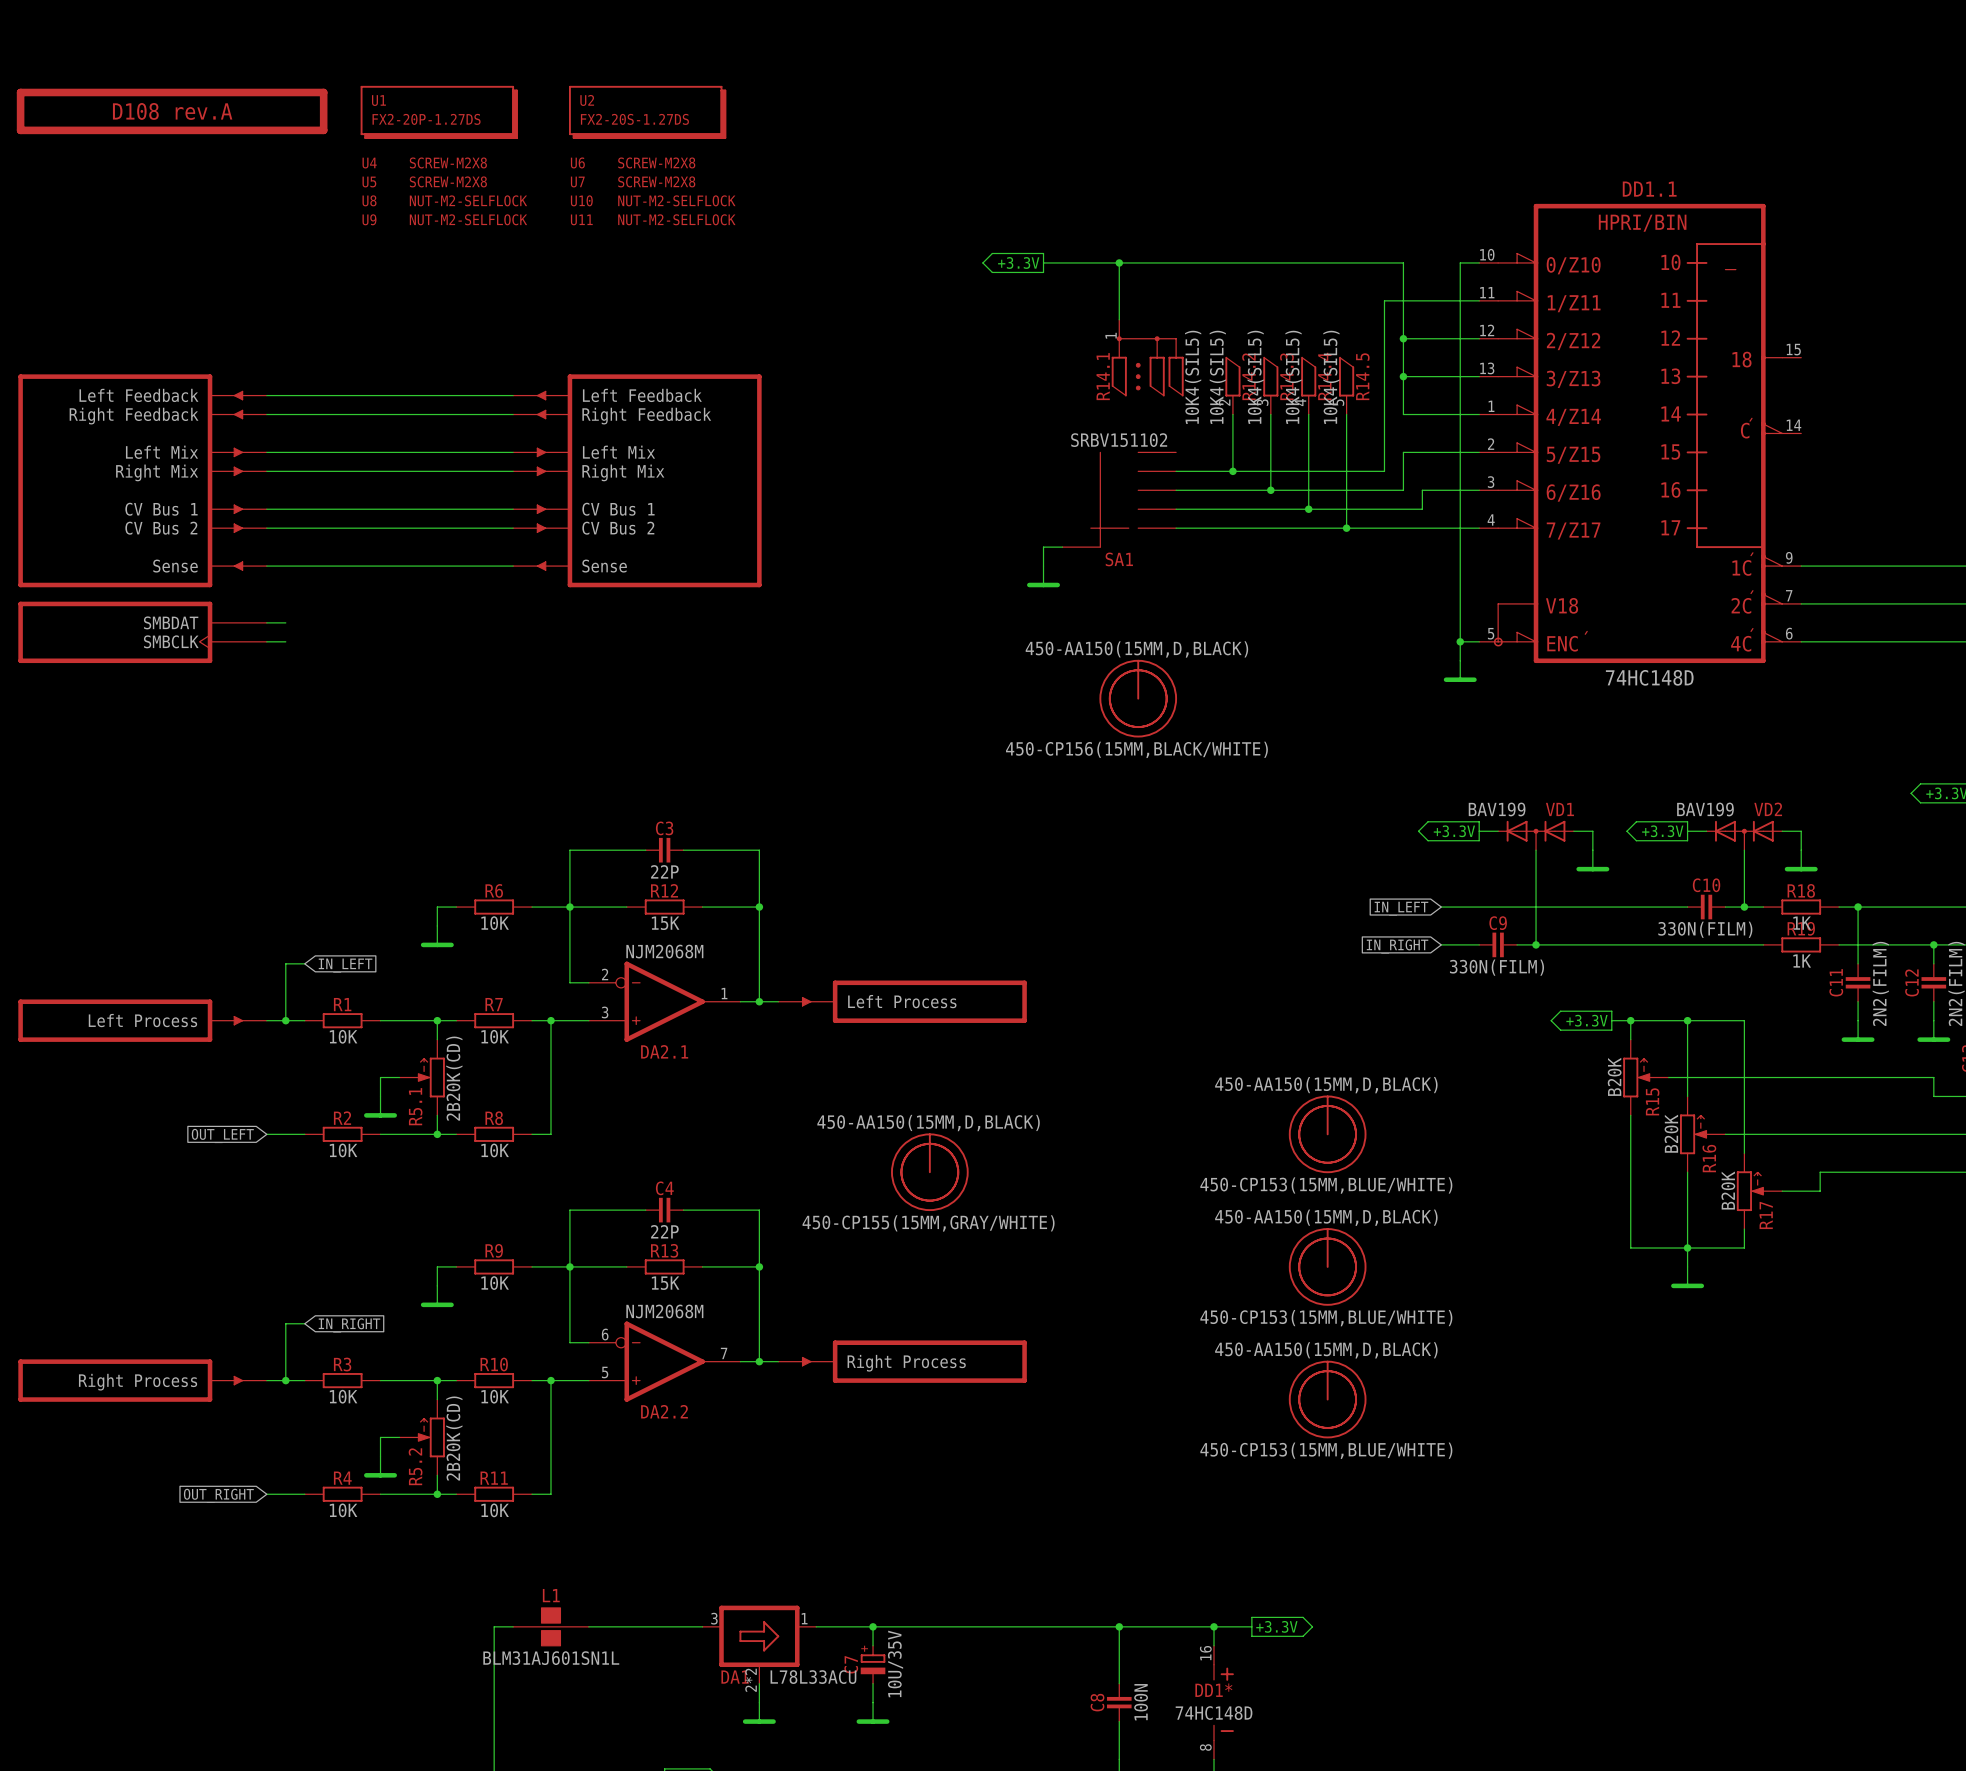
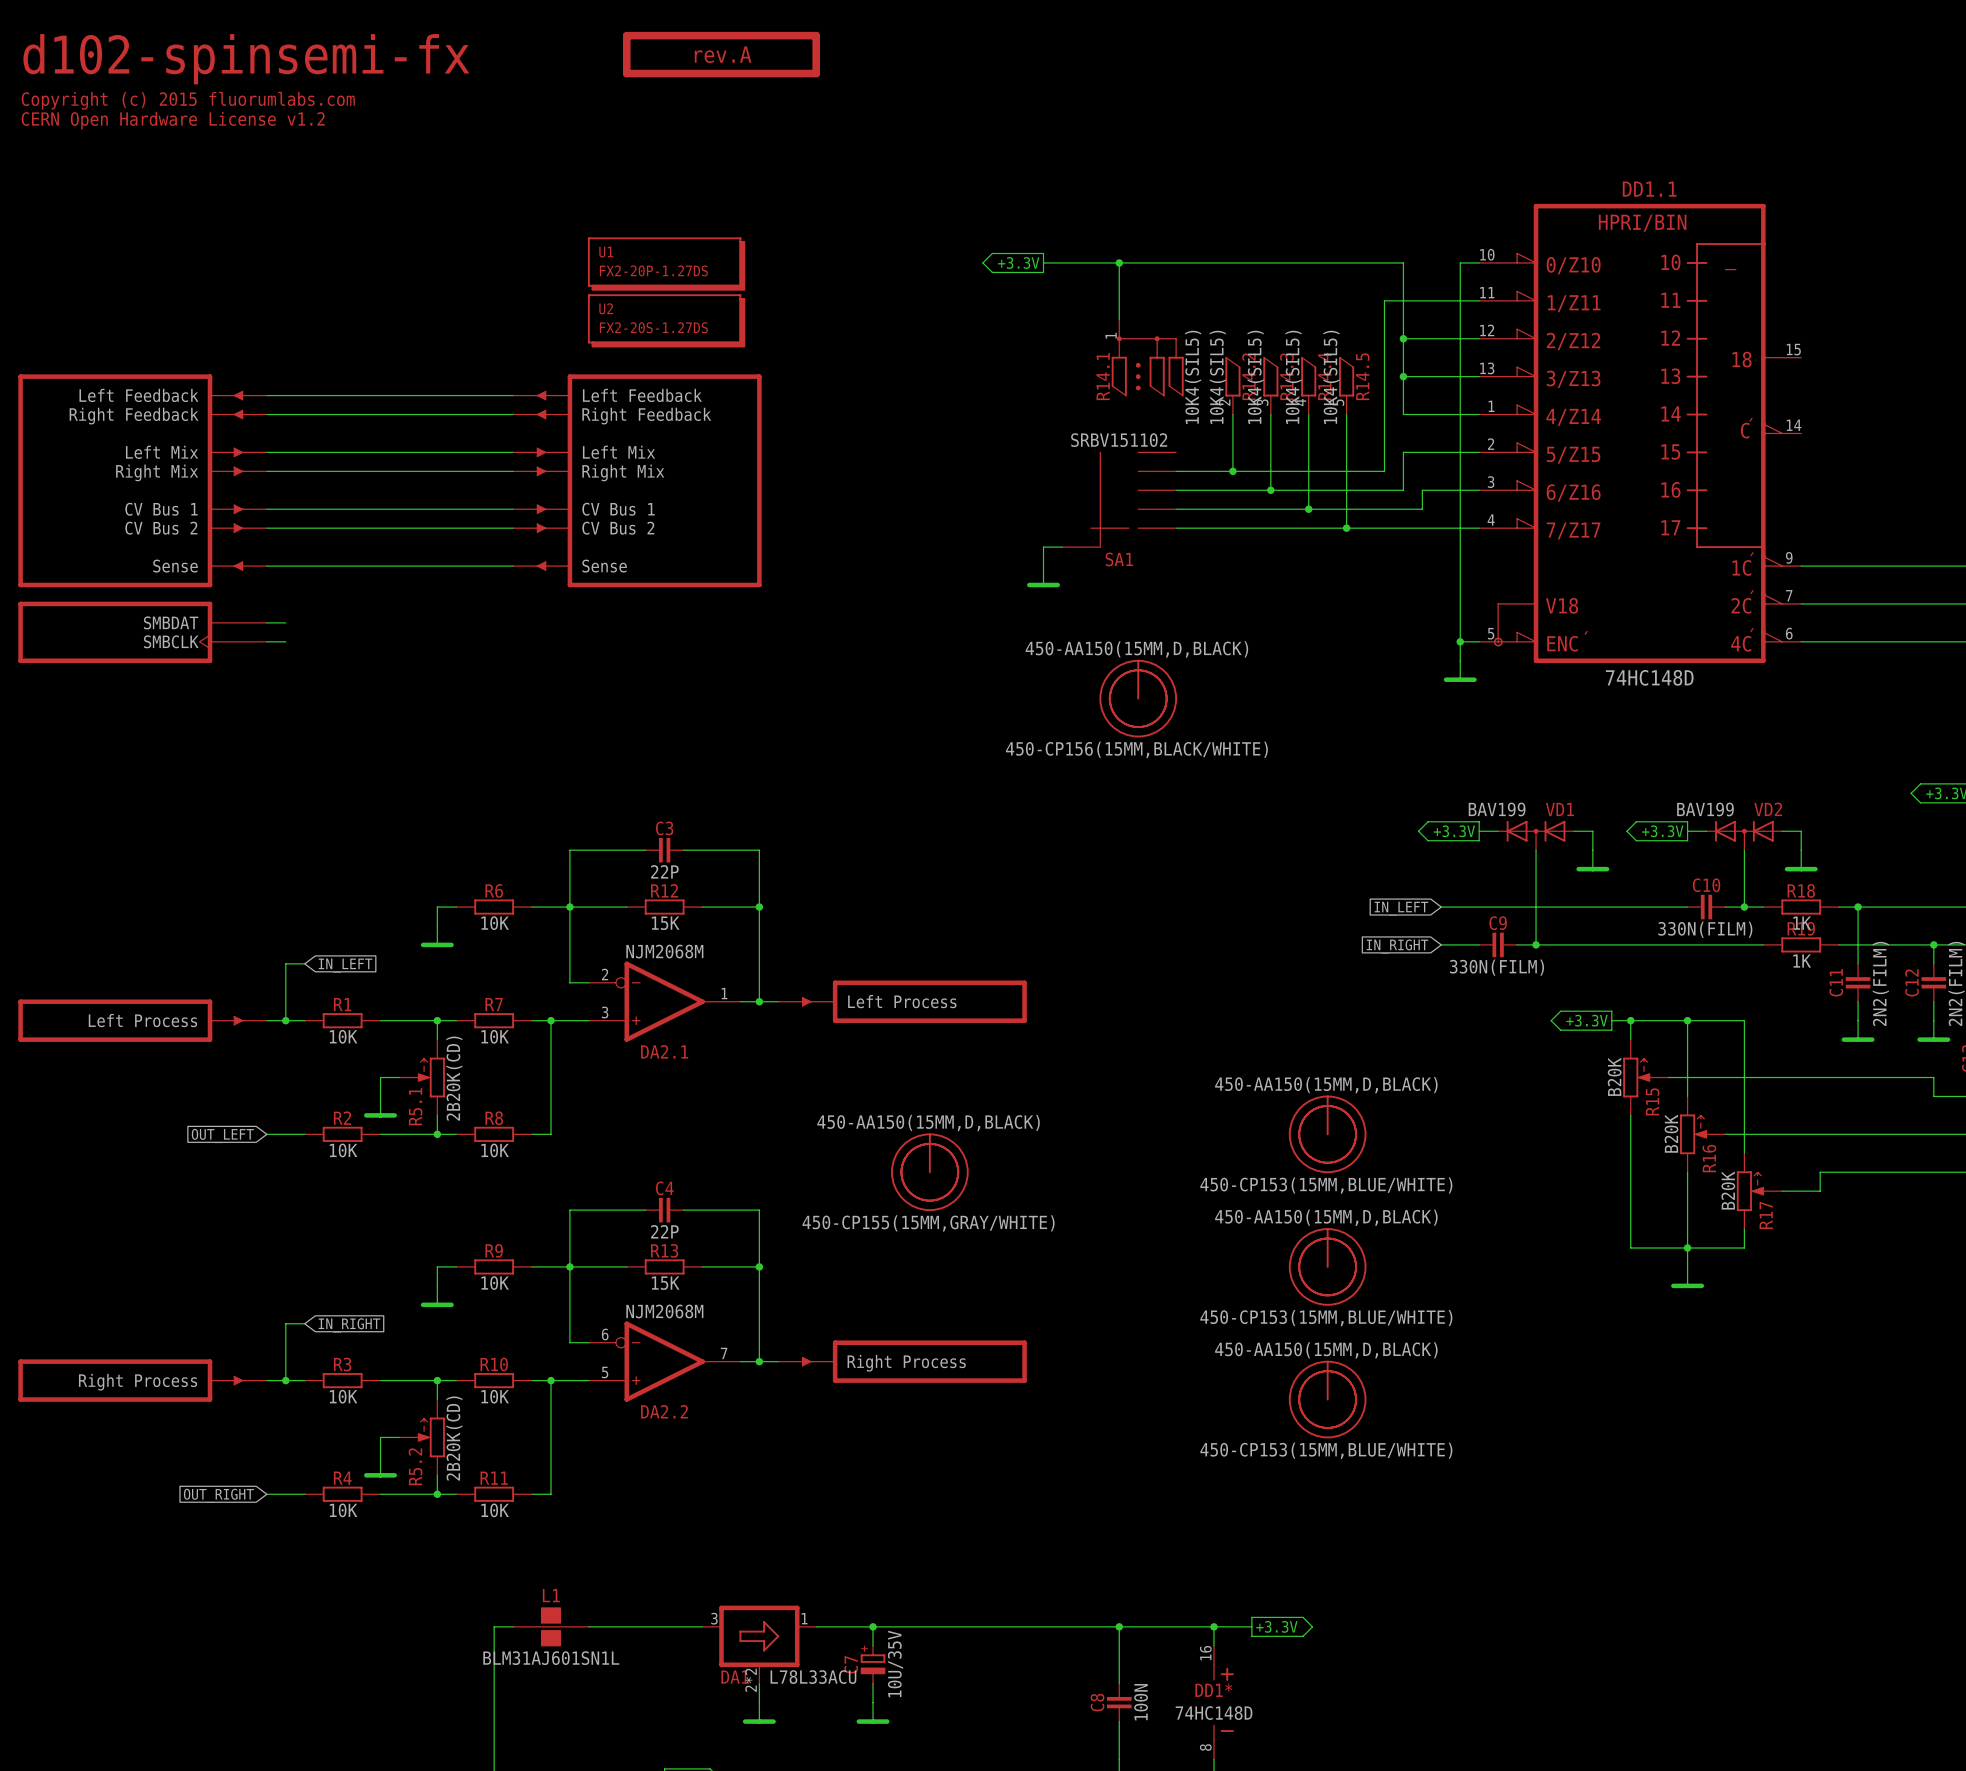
part: none -> rev.A (721, 54)
part: none -> (245, 81)
part: D108 rev.A (172, 111) -> none
U1 position: (439, 112) -> (666, 263)
U2 position: (647, 112) -> (666, 320)
U4: SCREW-M2X8 (424, 162) -> none
U6: SCREW-M2X8 (633, 162) -> none
U5: SCREW-M2X8 (424, 181) -> none
U7: SCREW-M2X8 (633, 181) -> none
U8: NUT-M2-SELFLOCK (444, 200) -> none
U10: NUT-M2-SELFLOCK (653, 200) -> none
U9: NUT-M2-SELFLOCK (444, 219) -> none
U11: NUT-M2-SELFLOCK (653, 219) -> none

